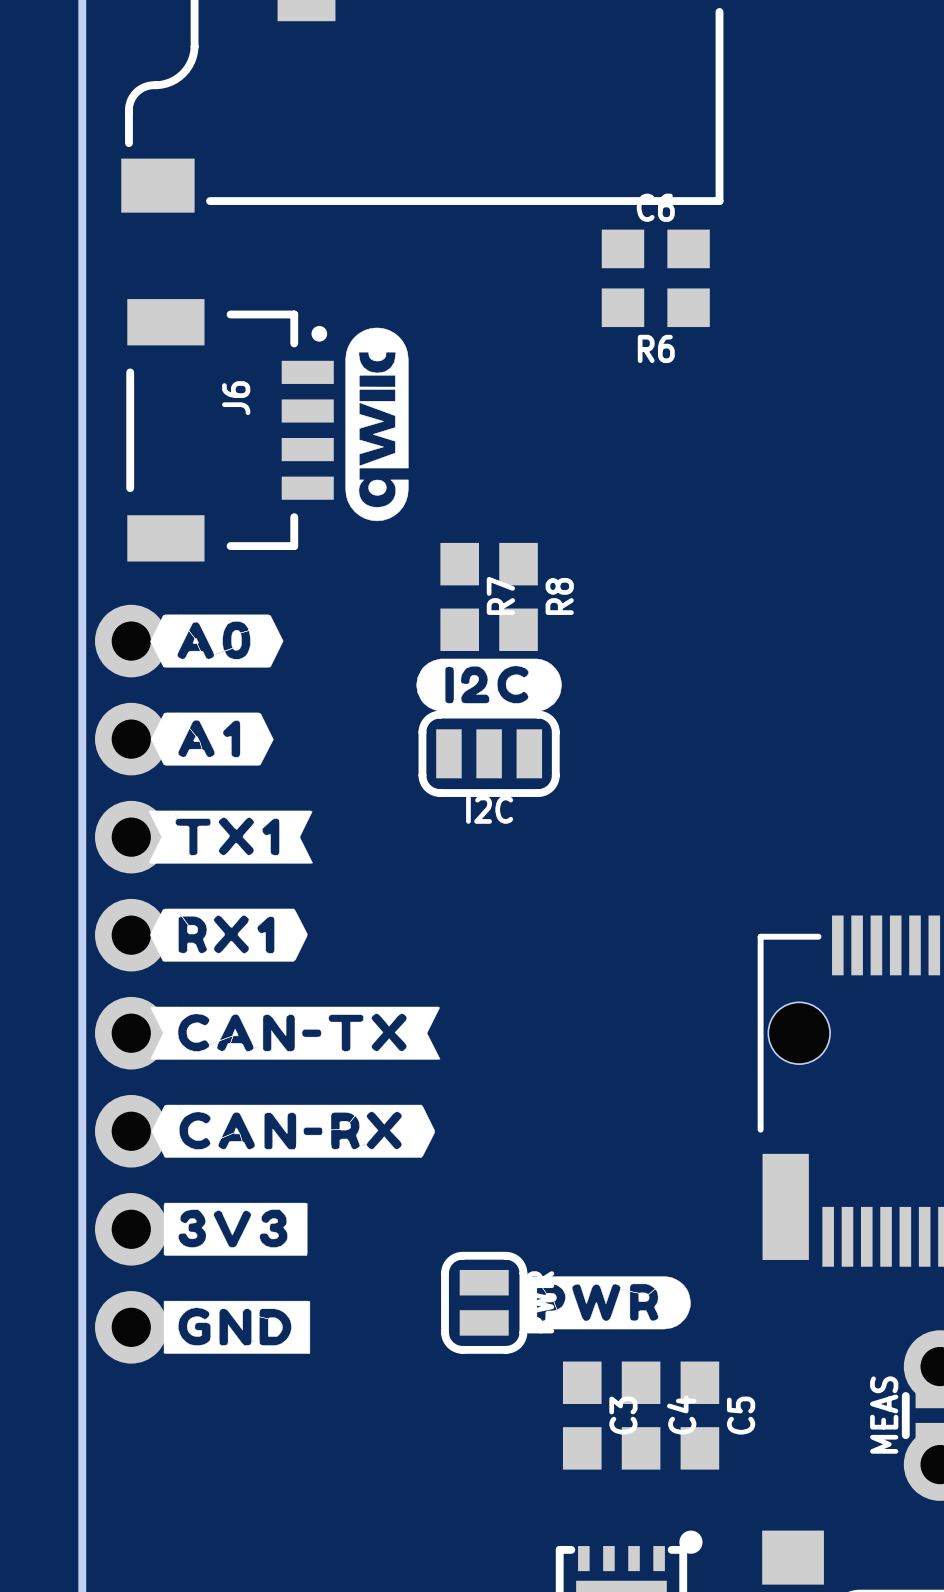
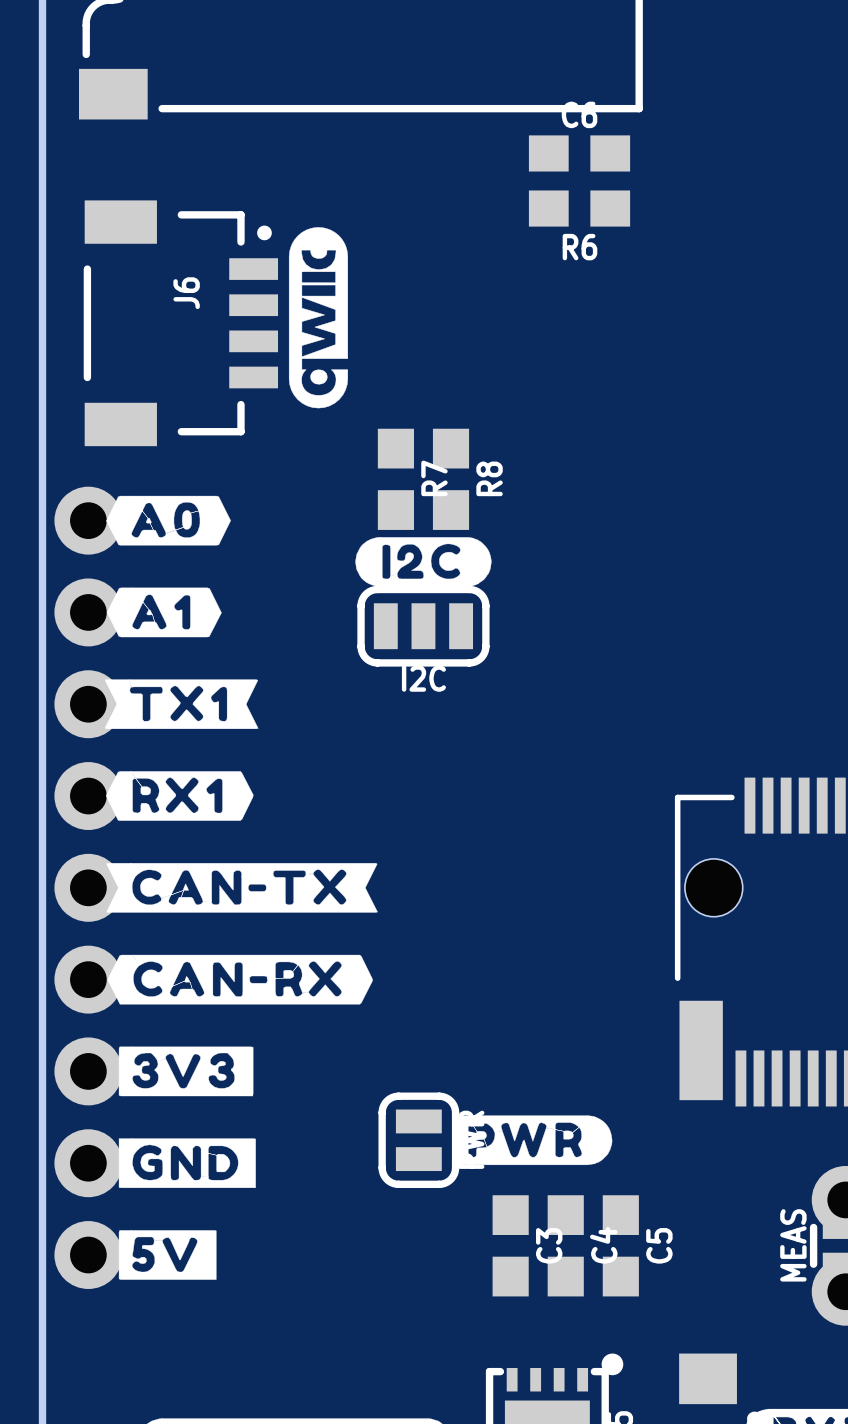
part: none -> (88, 887)
drawing: none -> [118, 1230, 217, 1280]

